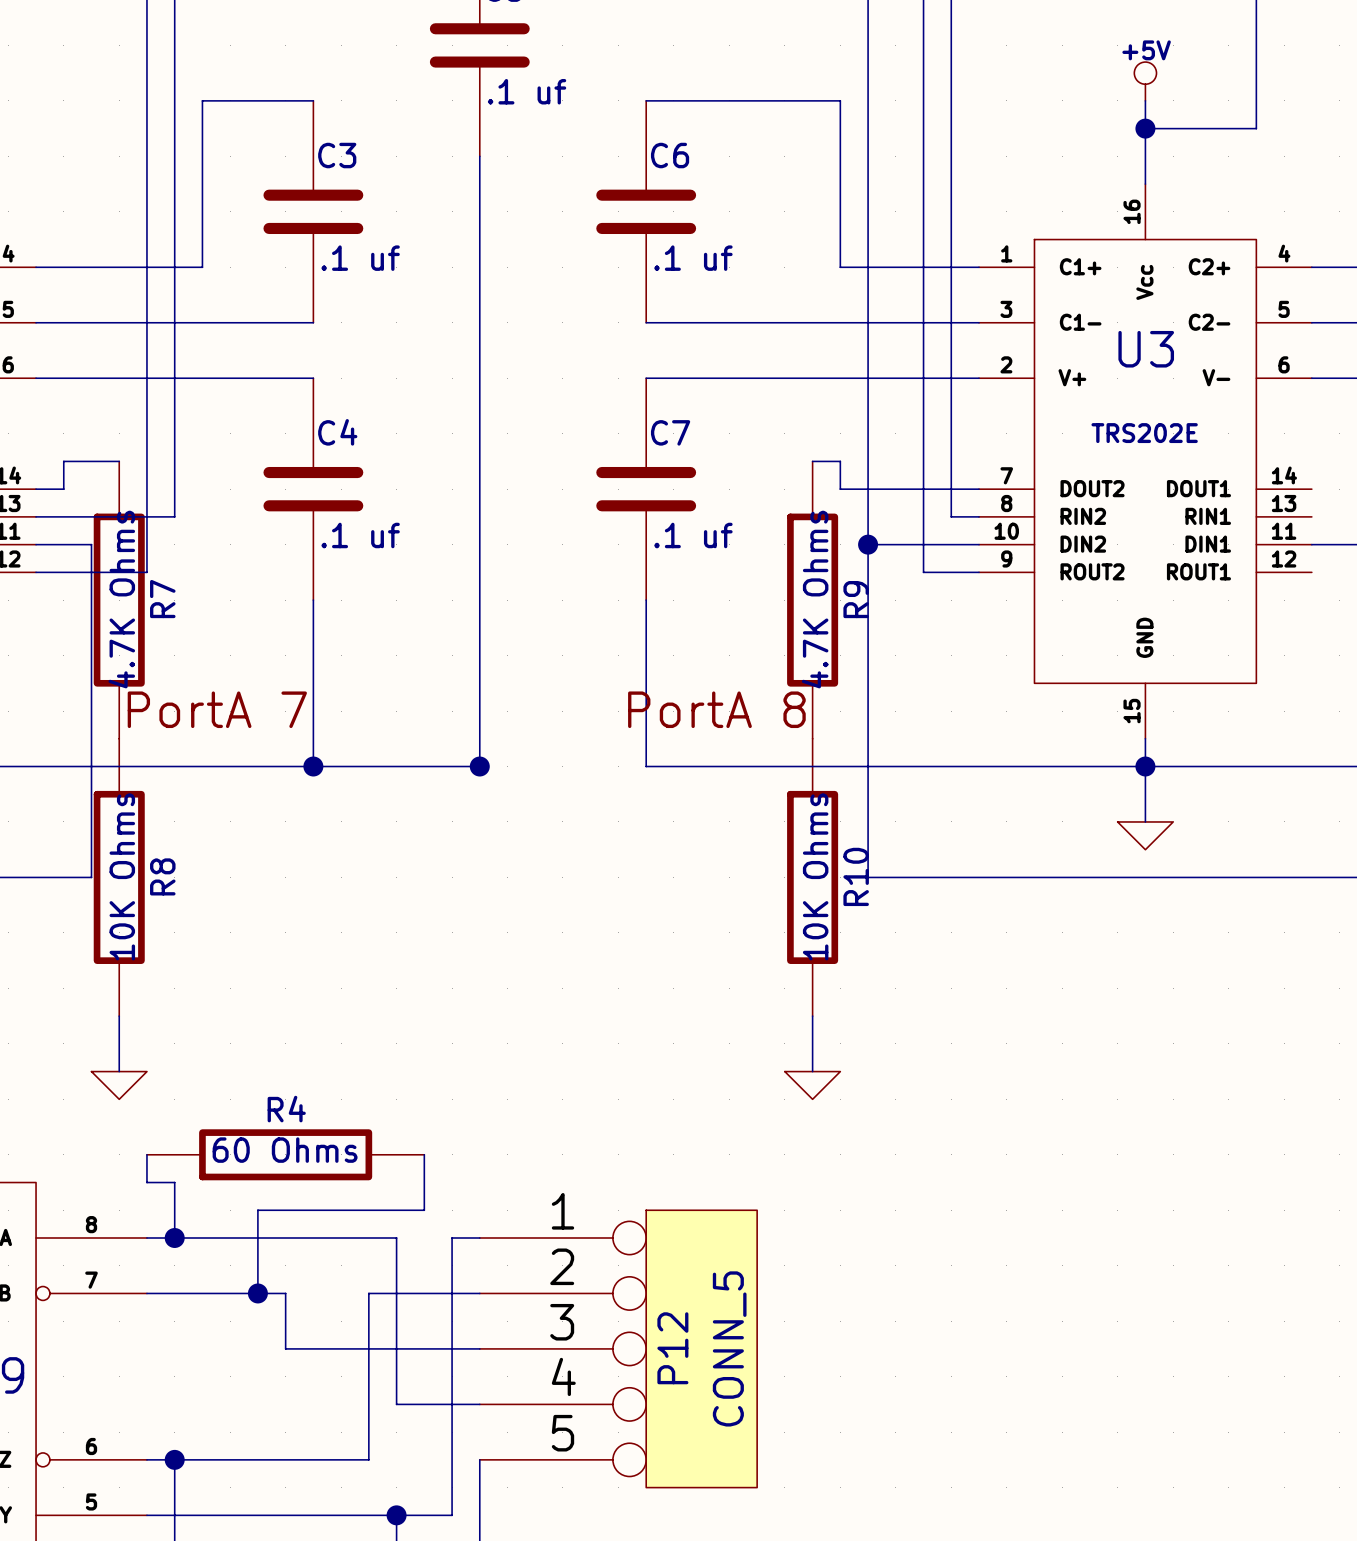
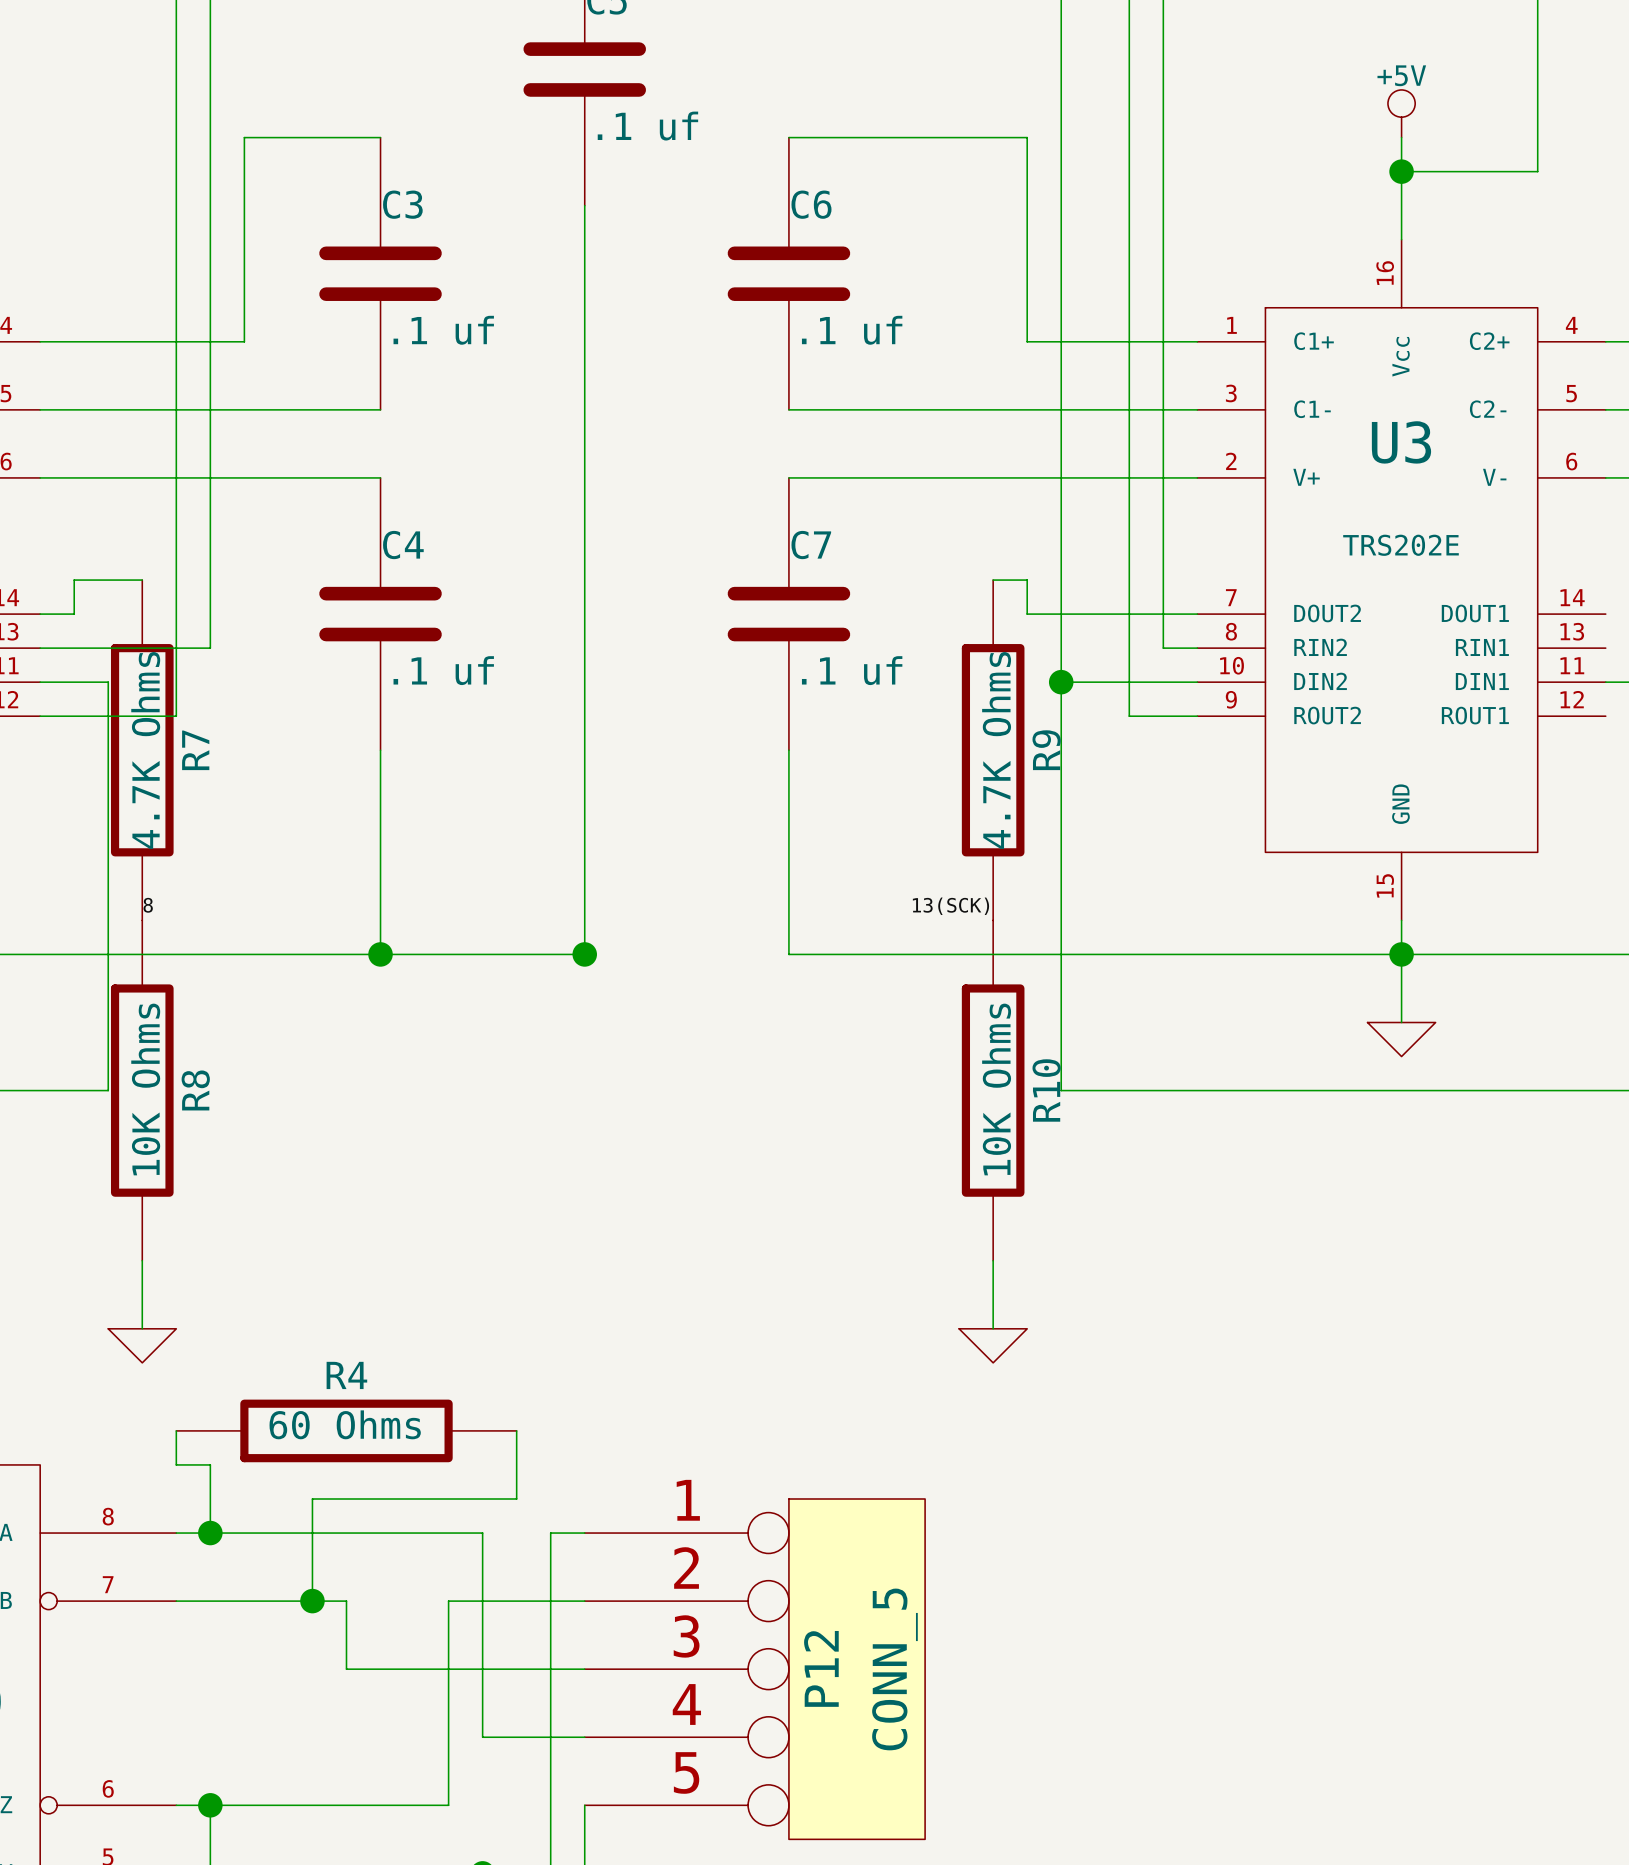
label: PortA 7 (217, 709) -> 8 (148, 905)
label: PortA 8 (716, 709) -> 13(SCK) (950, 906)

